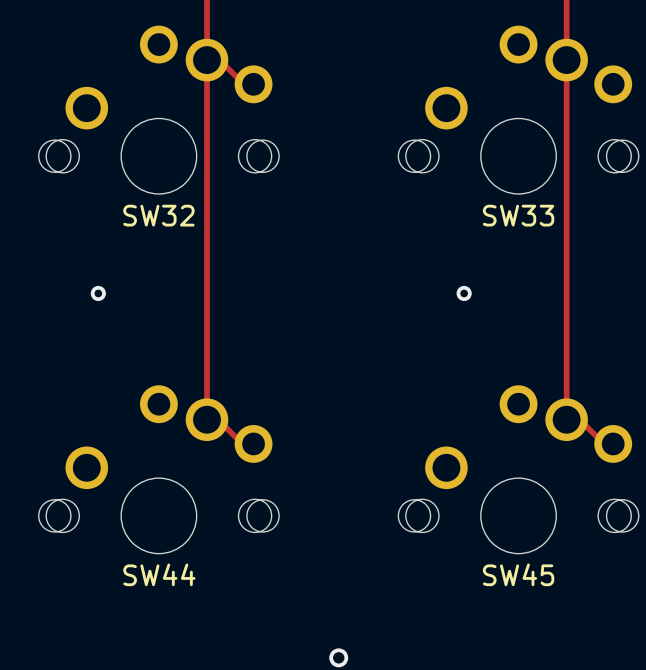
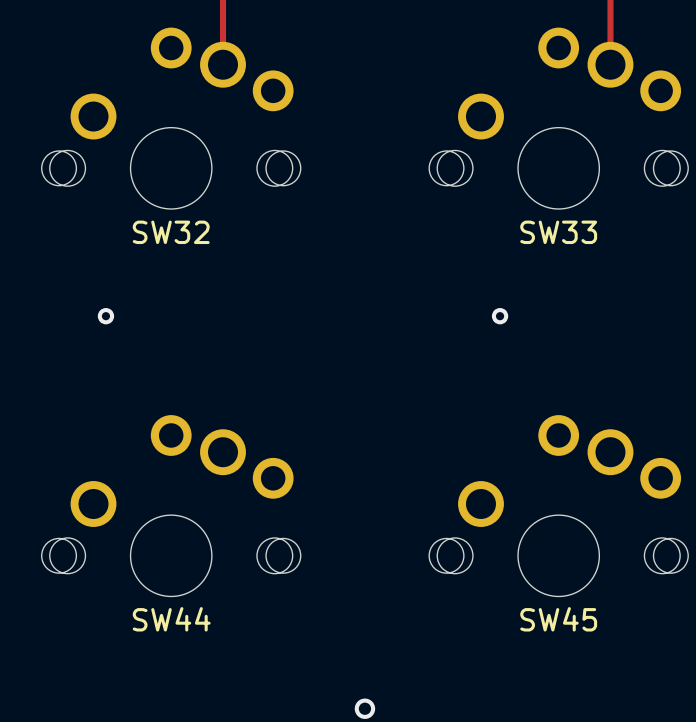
track: (566, 60) (566, 419) (579, 419) (603, 443) (613, 443) -> none
track: (253, 84) (243, 84) (219, 60) (206, 60) (206, 419) (218, 419) (242, 443) (253, 443) -> none

